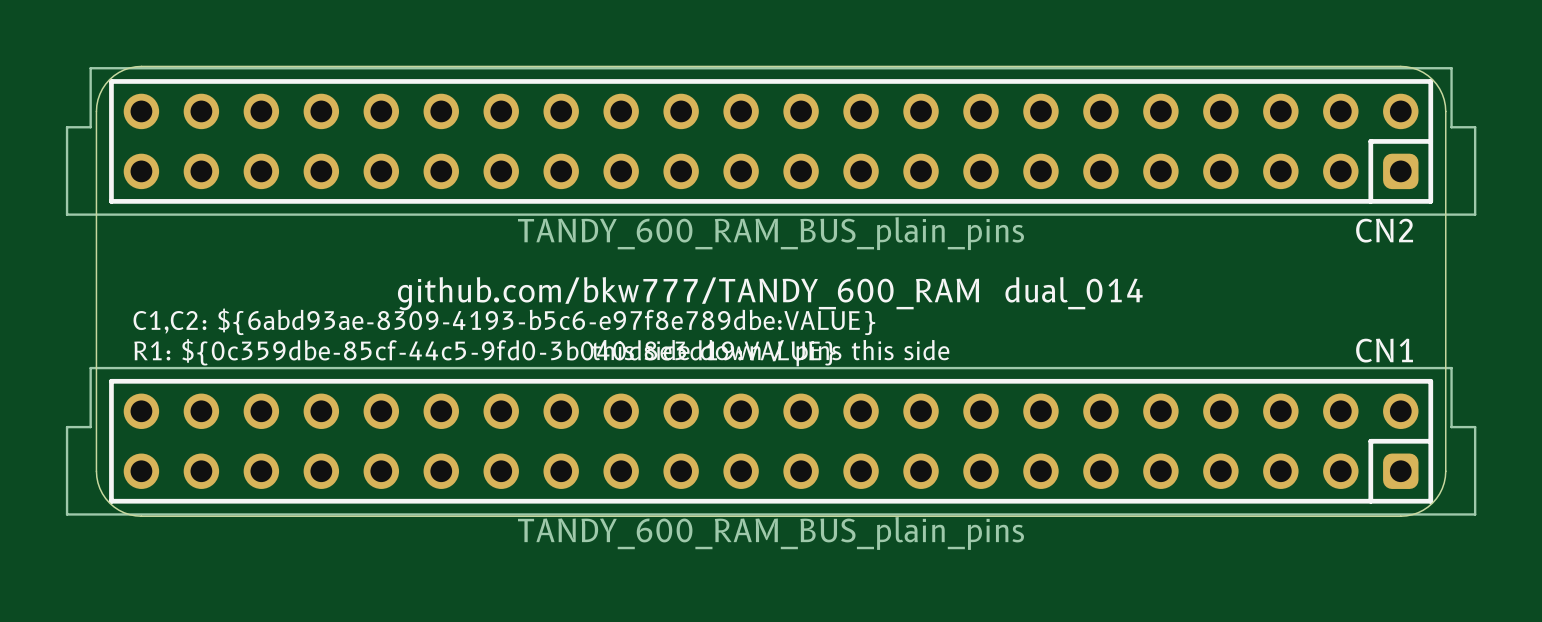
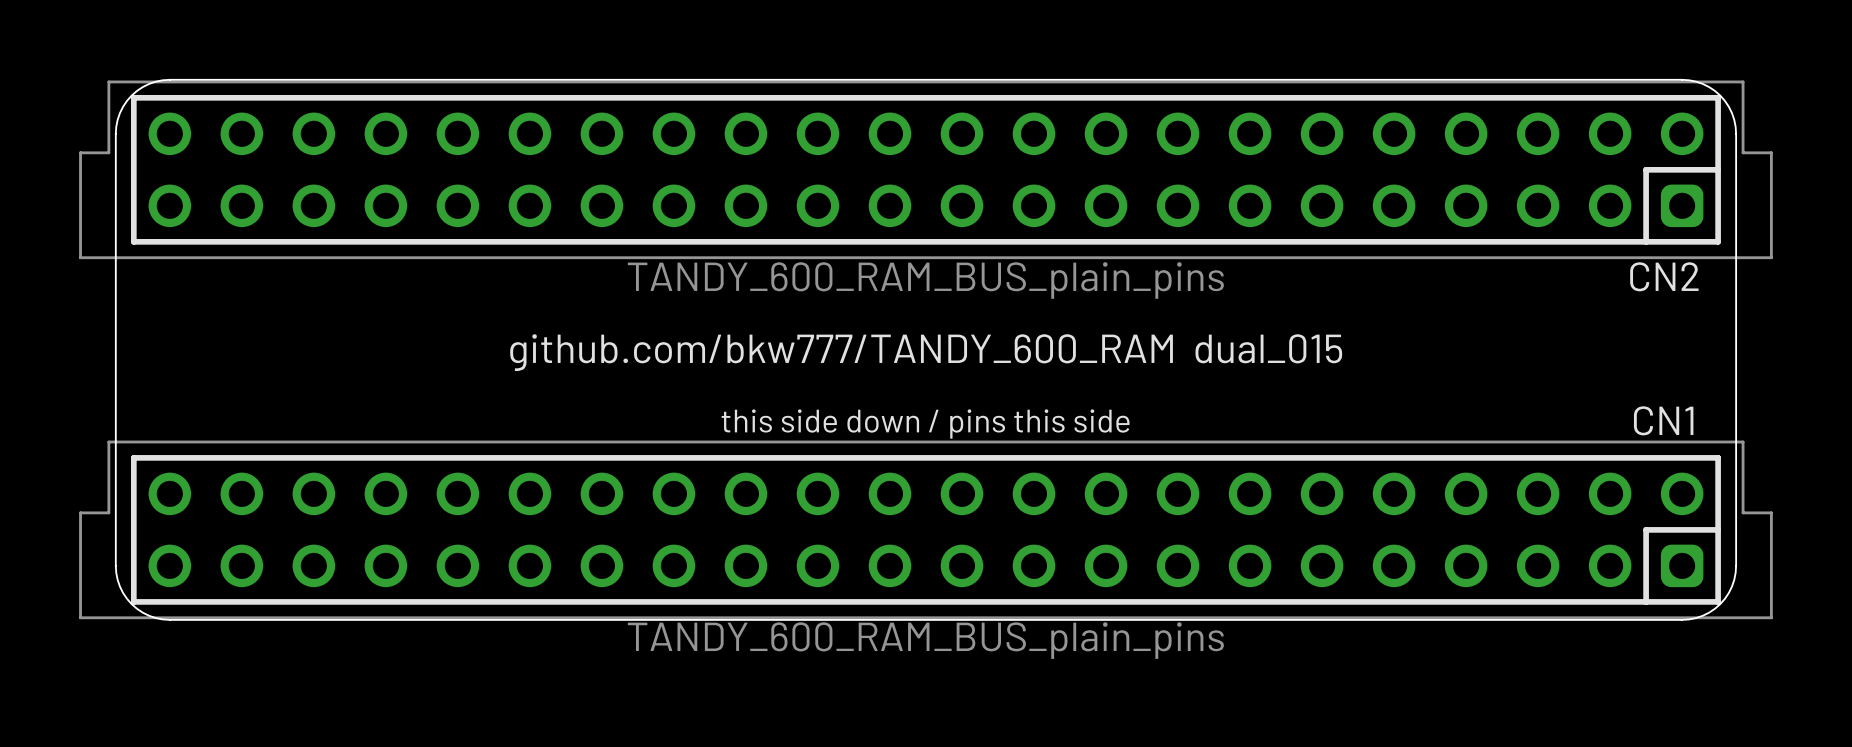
text: github.com/bkw777/TANDY_600_RAM dual_014 (770, 293) -> github.com/bkw777/TANDY_600_RAM dual_015 (926, 352)
text: C1,C2: ${6abd93ae-8309-4193-b5c6-e97f8e789dbe:VALUE} (504, 321) -> none
text: R1: ${0c359dbe-85cf-44c5-9fd0-3b040d8e3d19:VALUE} (484, 352) -> none

